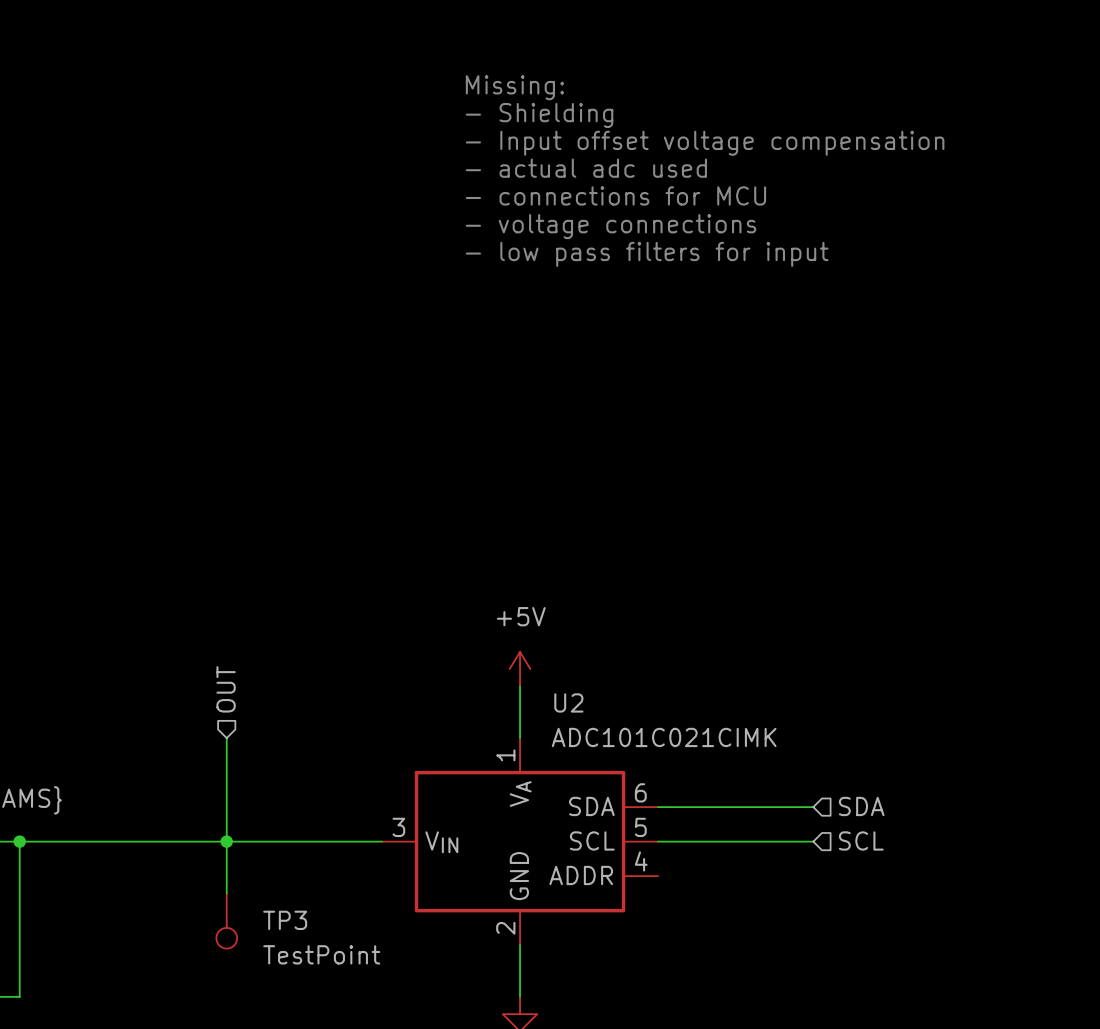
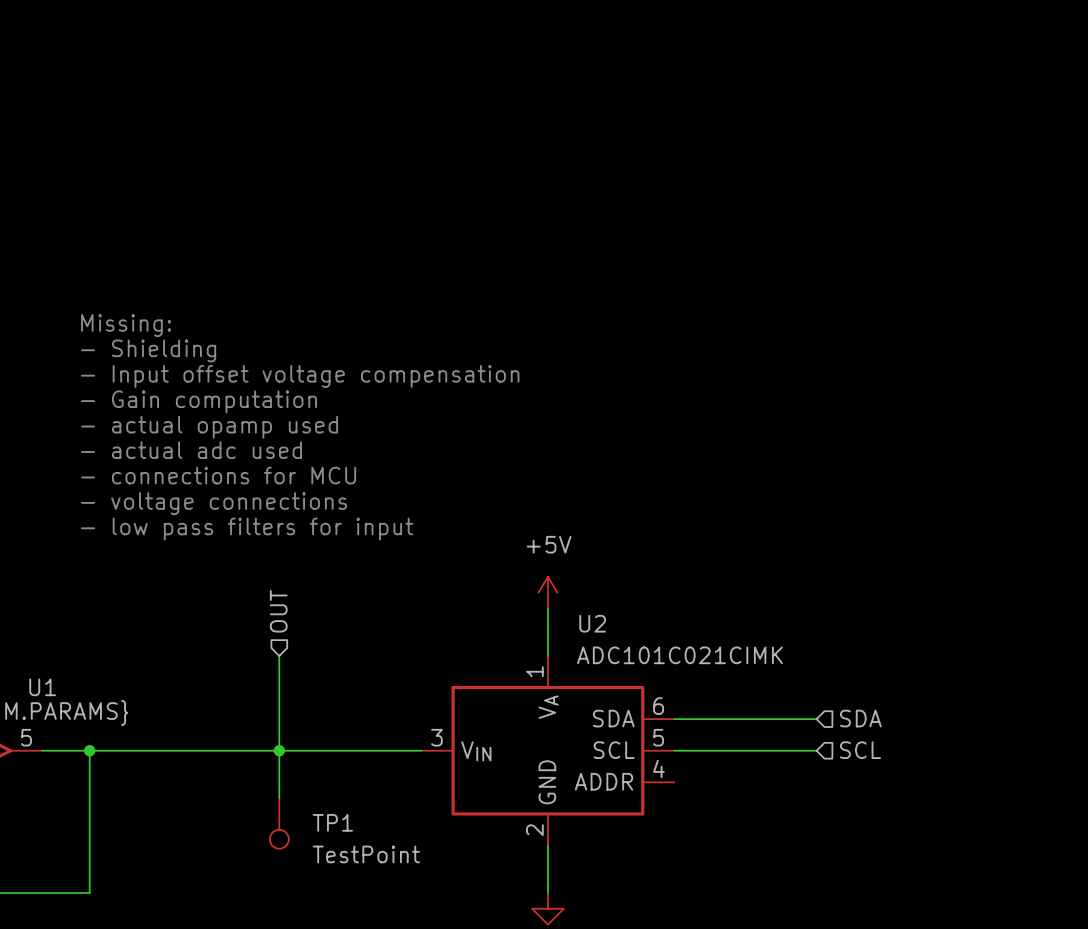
text: Missing: (514, 87) -> none
text: - Shielding (539, 115) -> none
text: - Input offset voltage compensation (705, 143) -> none
text: - actual adc used (586, 168) -> none
text: - connections for MCU (615, 195) -> none
text: - voltage connections (611, 226) -> none
text: - low pass filters for input (647, 254) -> none
text: none -> Missing: (126, 325)
text: none -> - Shielding (148, 350)
text: none -> - Input offset voltage compensation (300, 376)
text: none -> - Gain computation (199, 401)
text: none -> - actual opamp used (209, 427)
text: none -> - actual adc used (191, 450)
text: none -> - connections for MCU (218, 475)
text: none -> - voltage connections (214, 503)
text: none -> - low pass filters for input (247, 529)
TP3 name: TP3 (285, 920) -> TP1 (332, 822)

